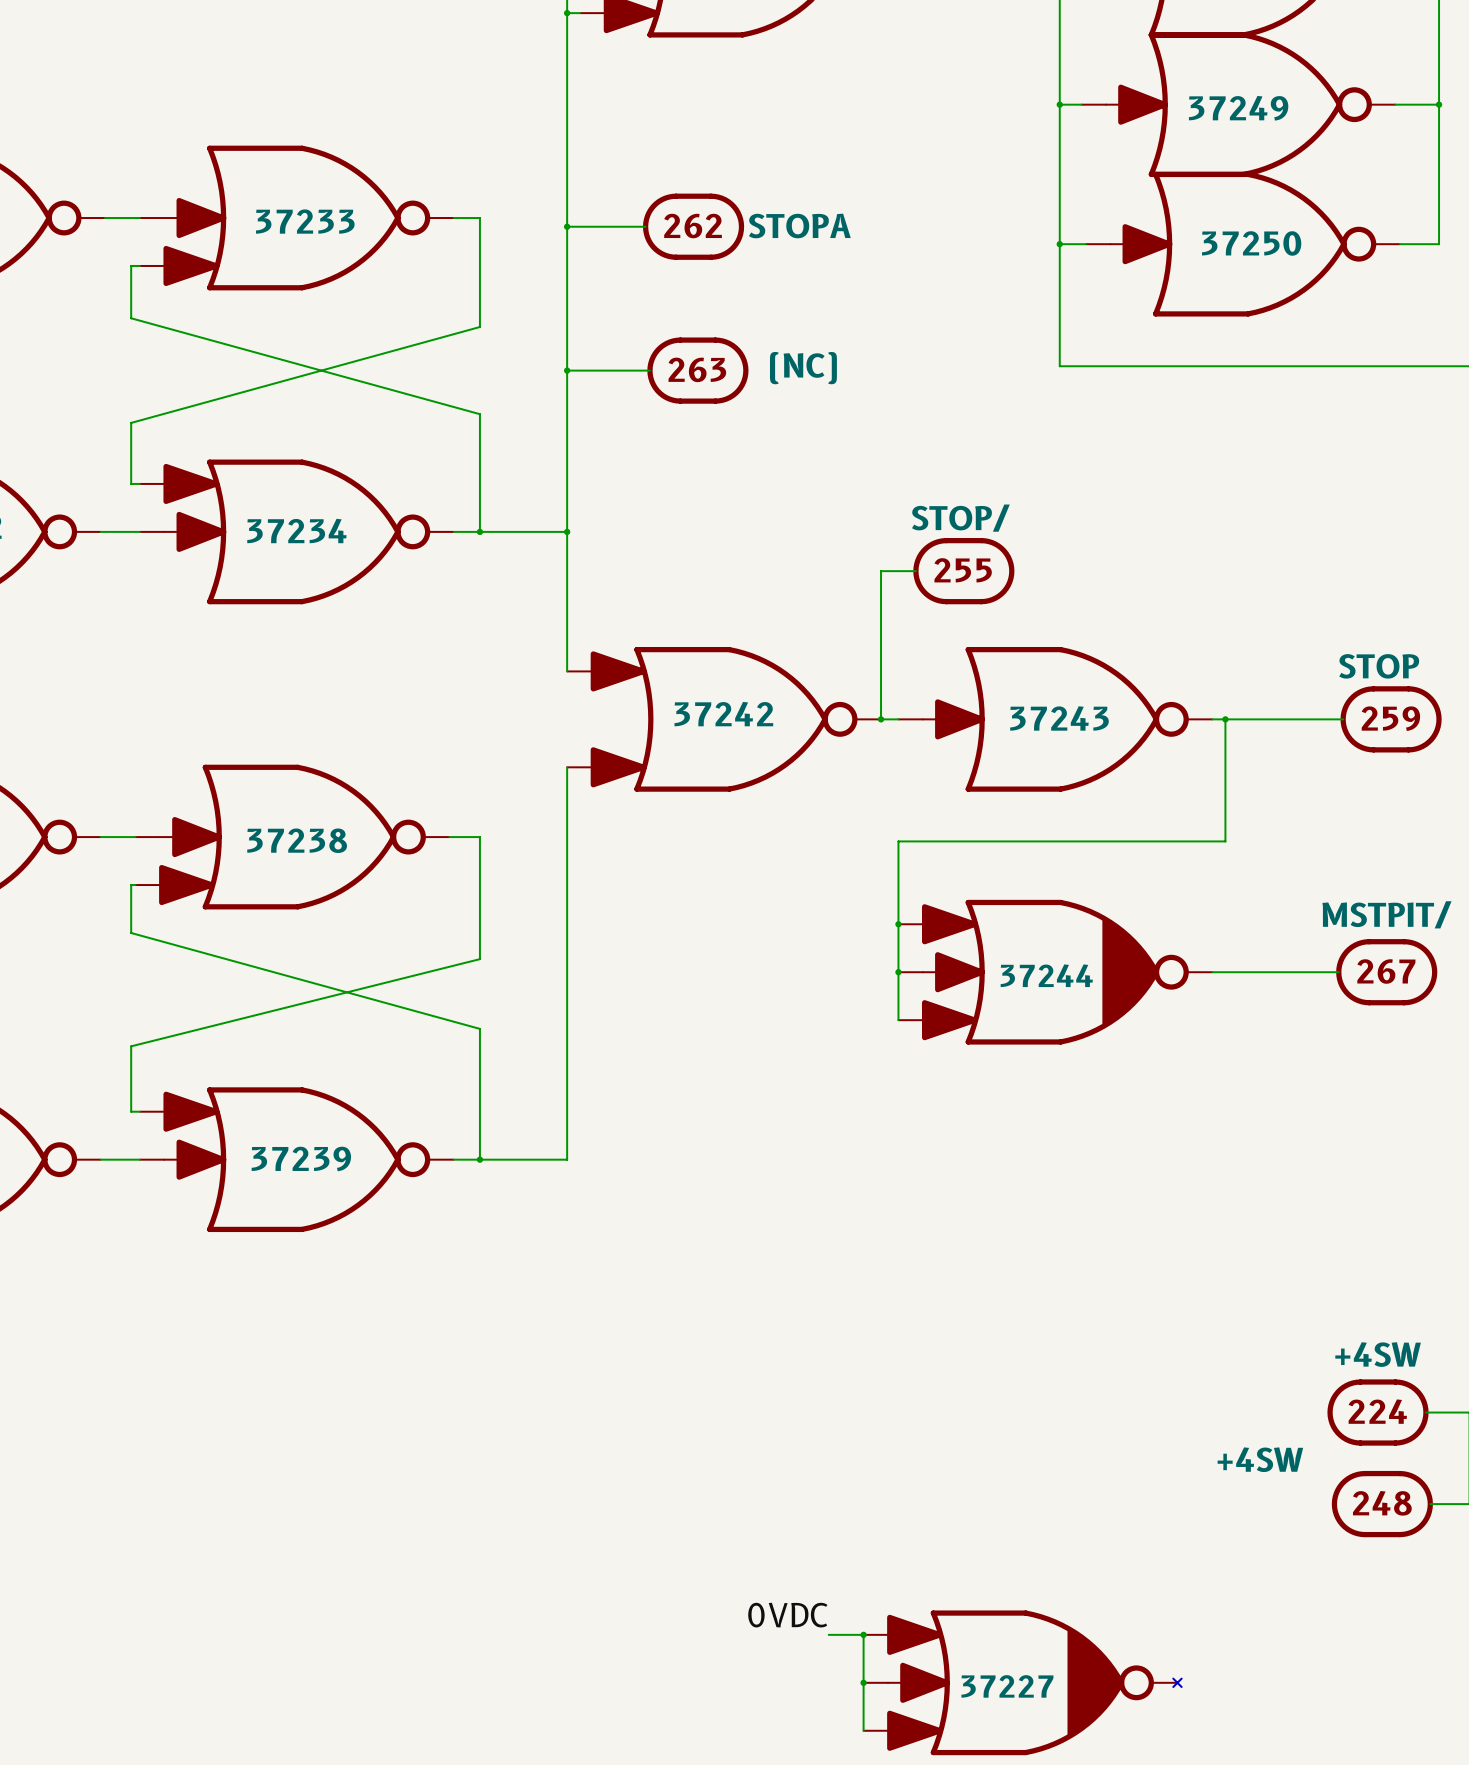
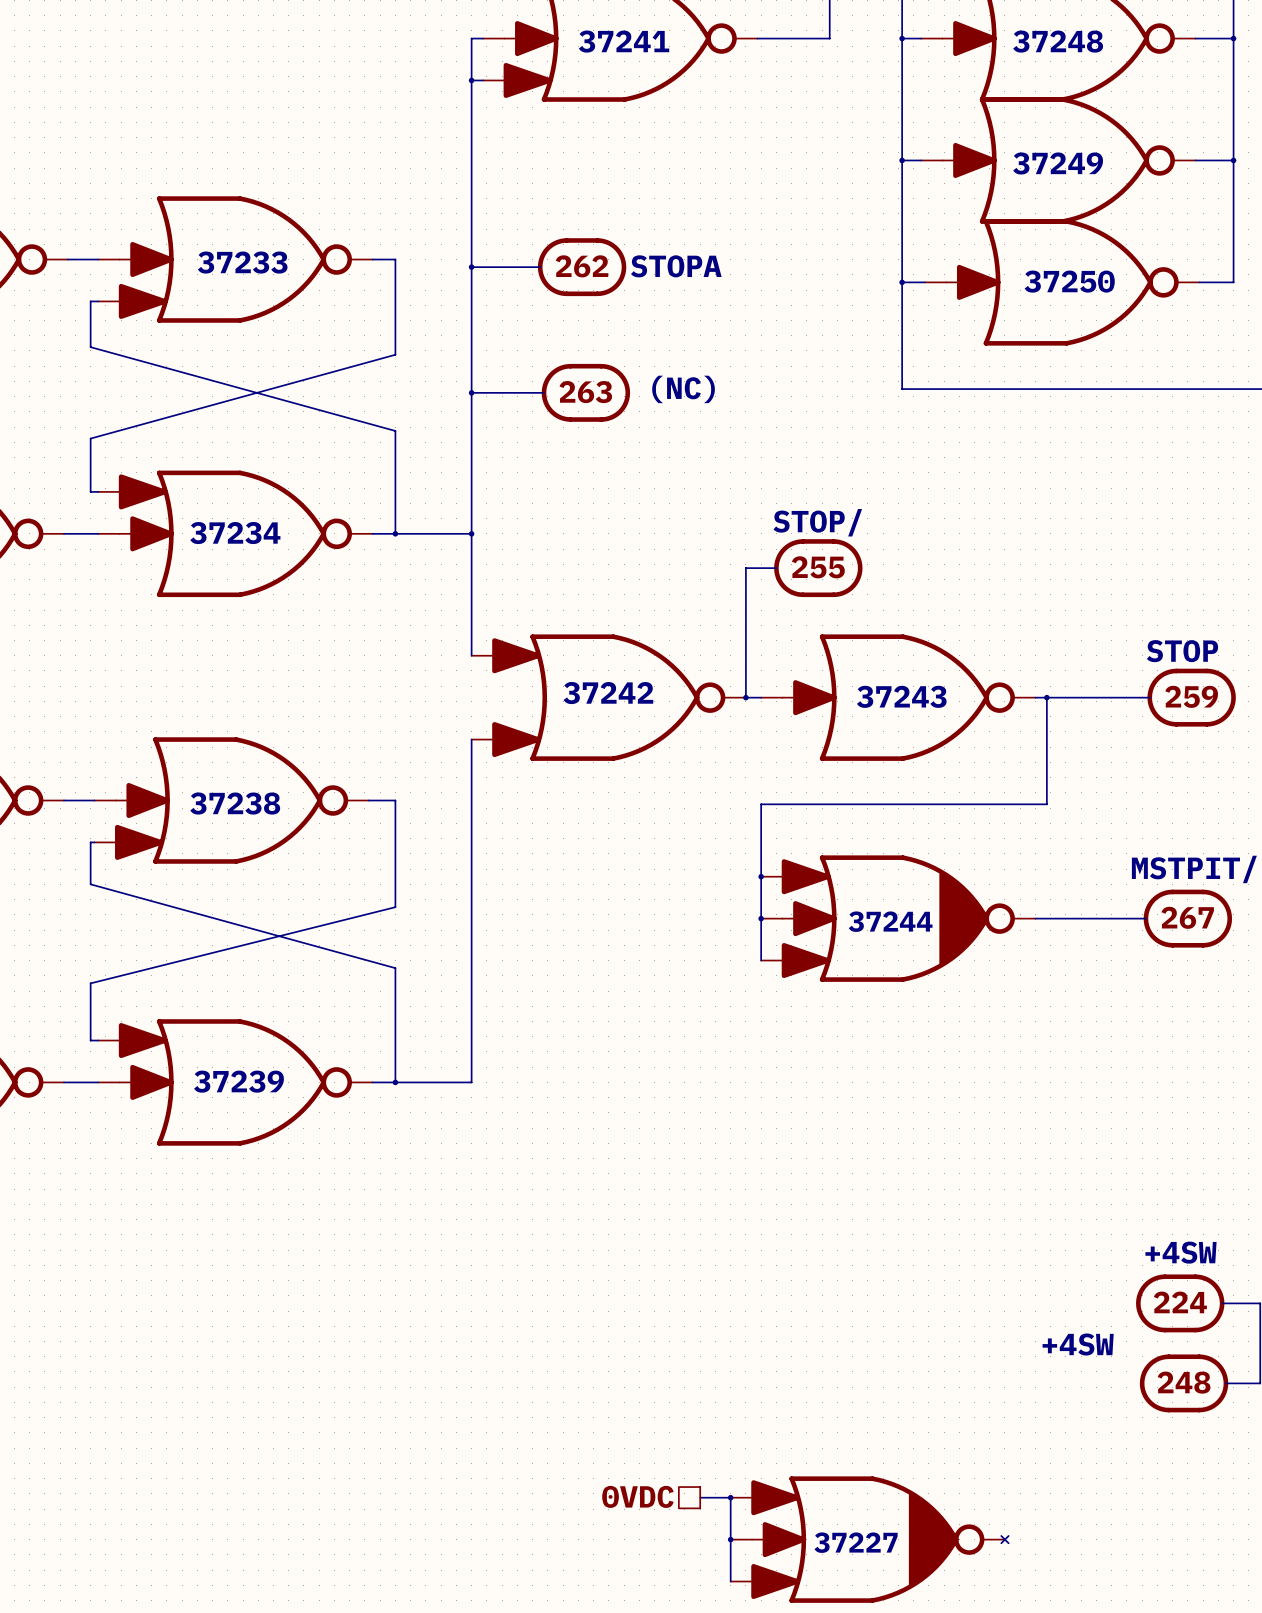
label: 0VDC (787, 1615) -> none
hierarchical label: none -> 0VDC (637, 1496)

